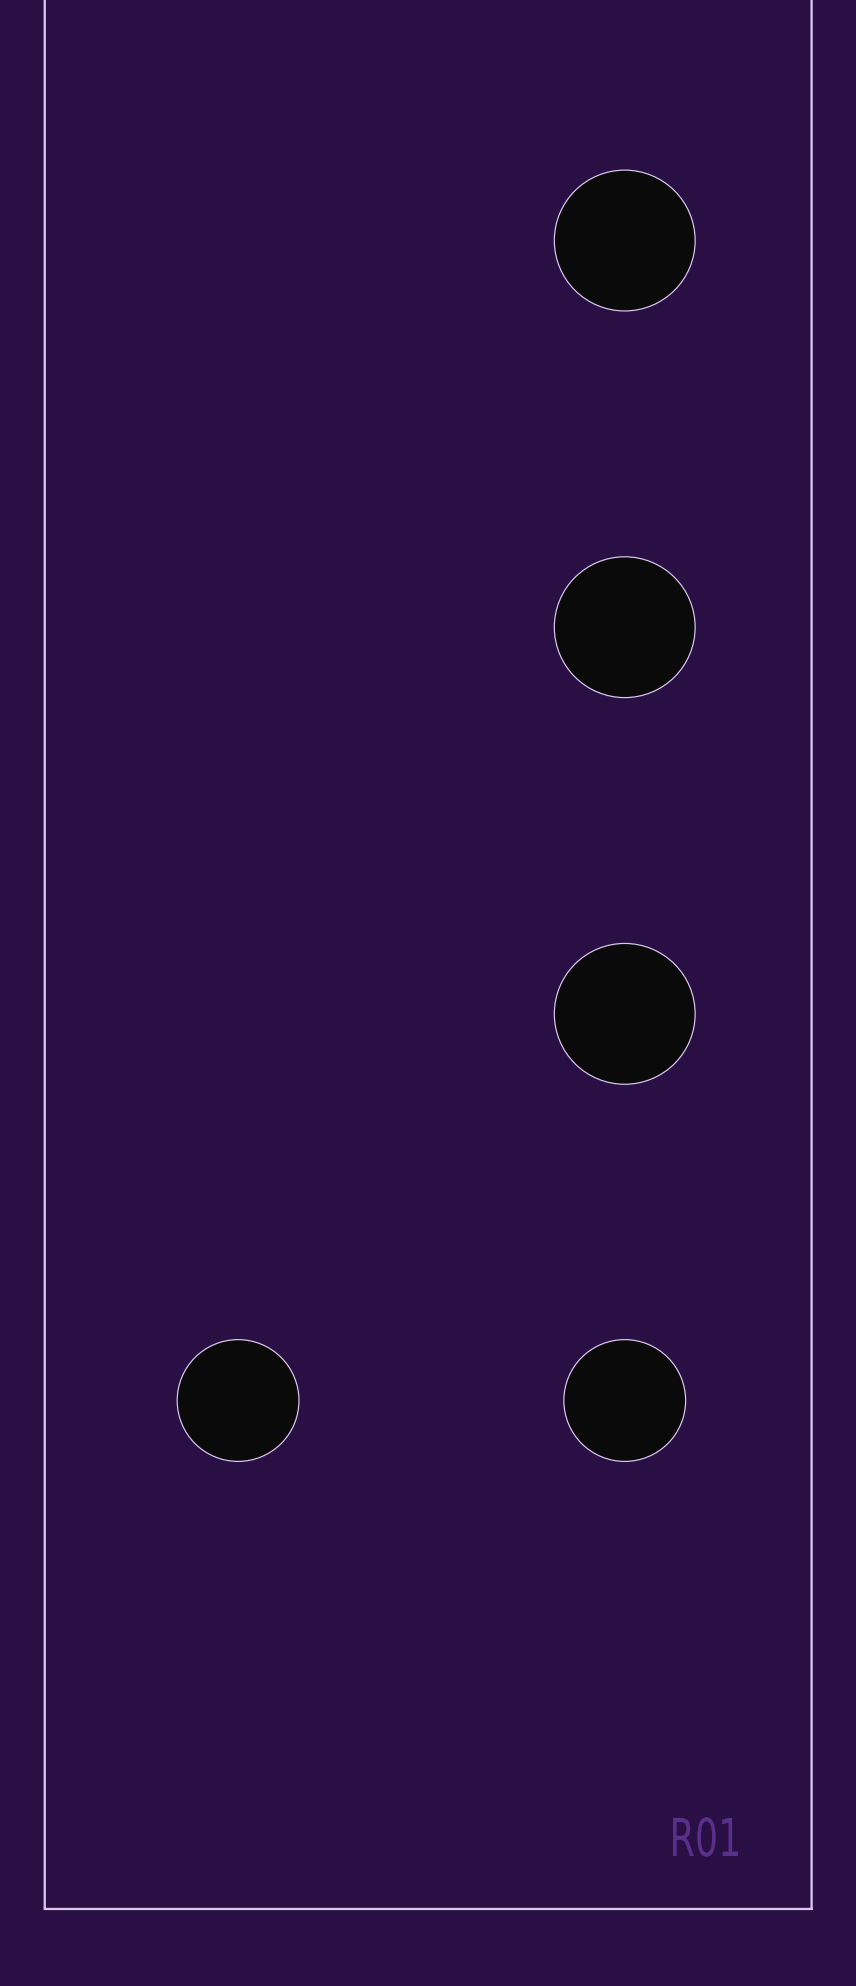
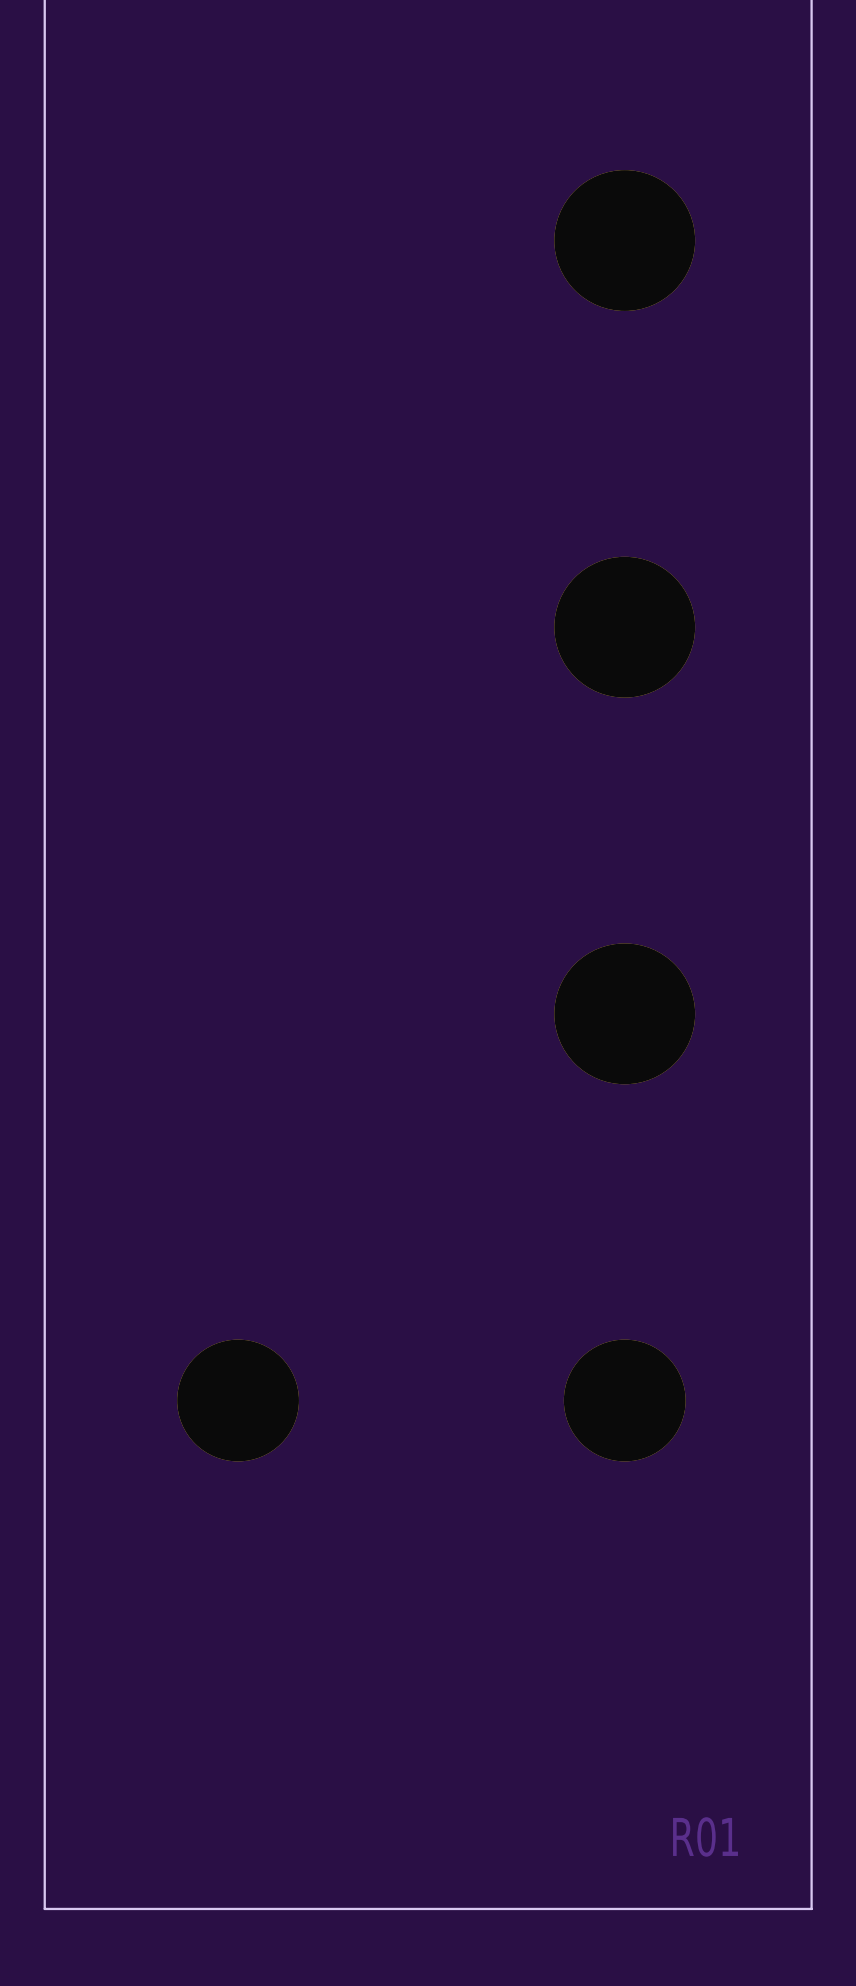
part footprint: [554, 170, 696, 311] -> [554, 170, 696, 311]
part footprint: [554, 556, 696, 698] -> [554, 556, 696, 698]
part footprint: [554, 943, 696, 1085] -> [554, 943, 696, 1085]
part footprint: [177, 1339, 299, 1462] -> [177, 1339, 299, 1462]
part footprint: [563, 1339, 686, 1462] -> [563, 1339, 686, 1462]

